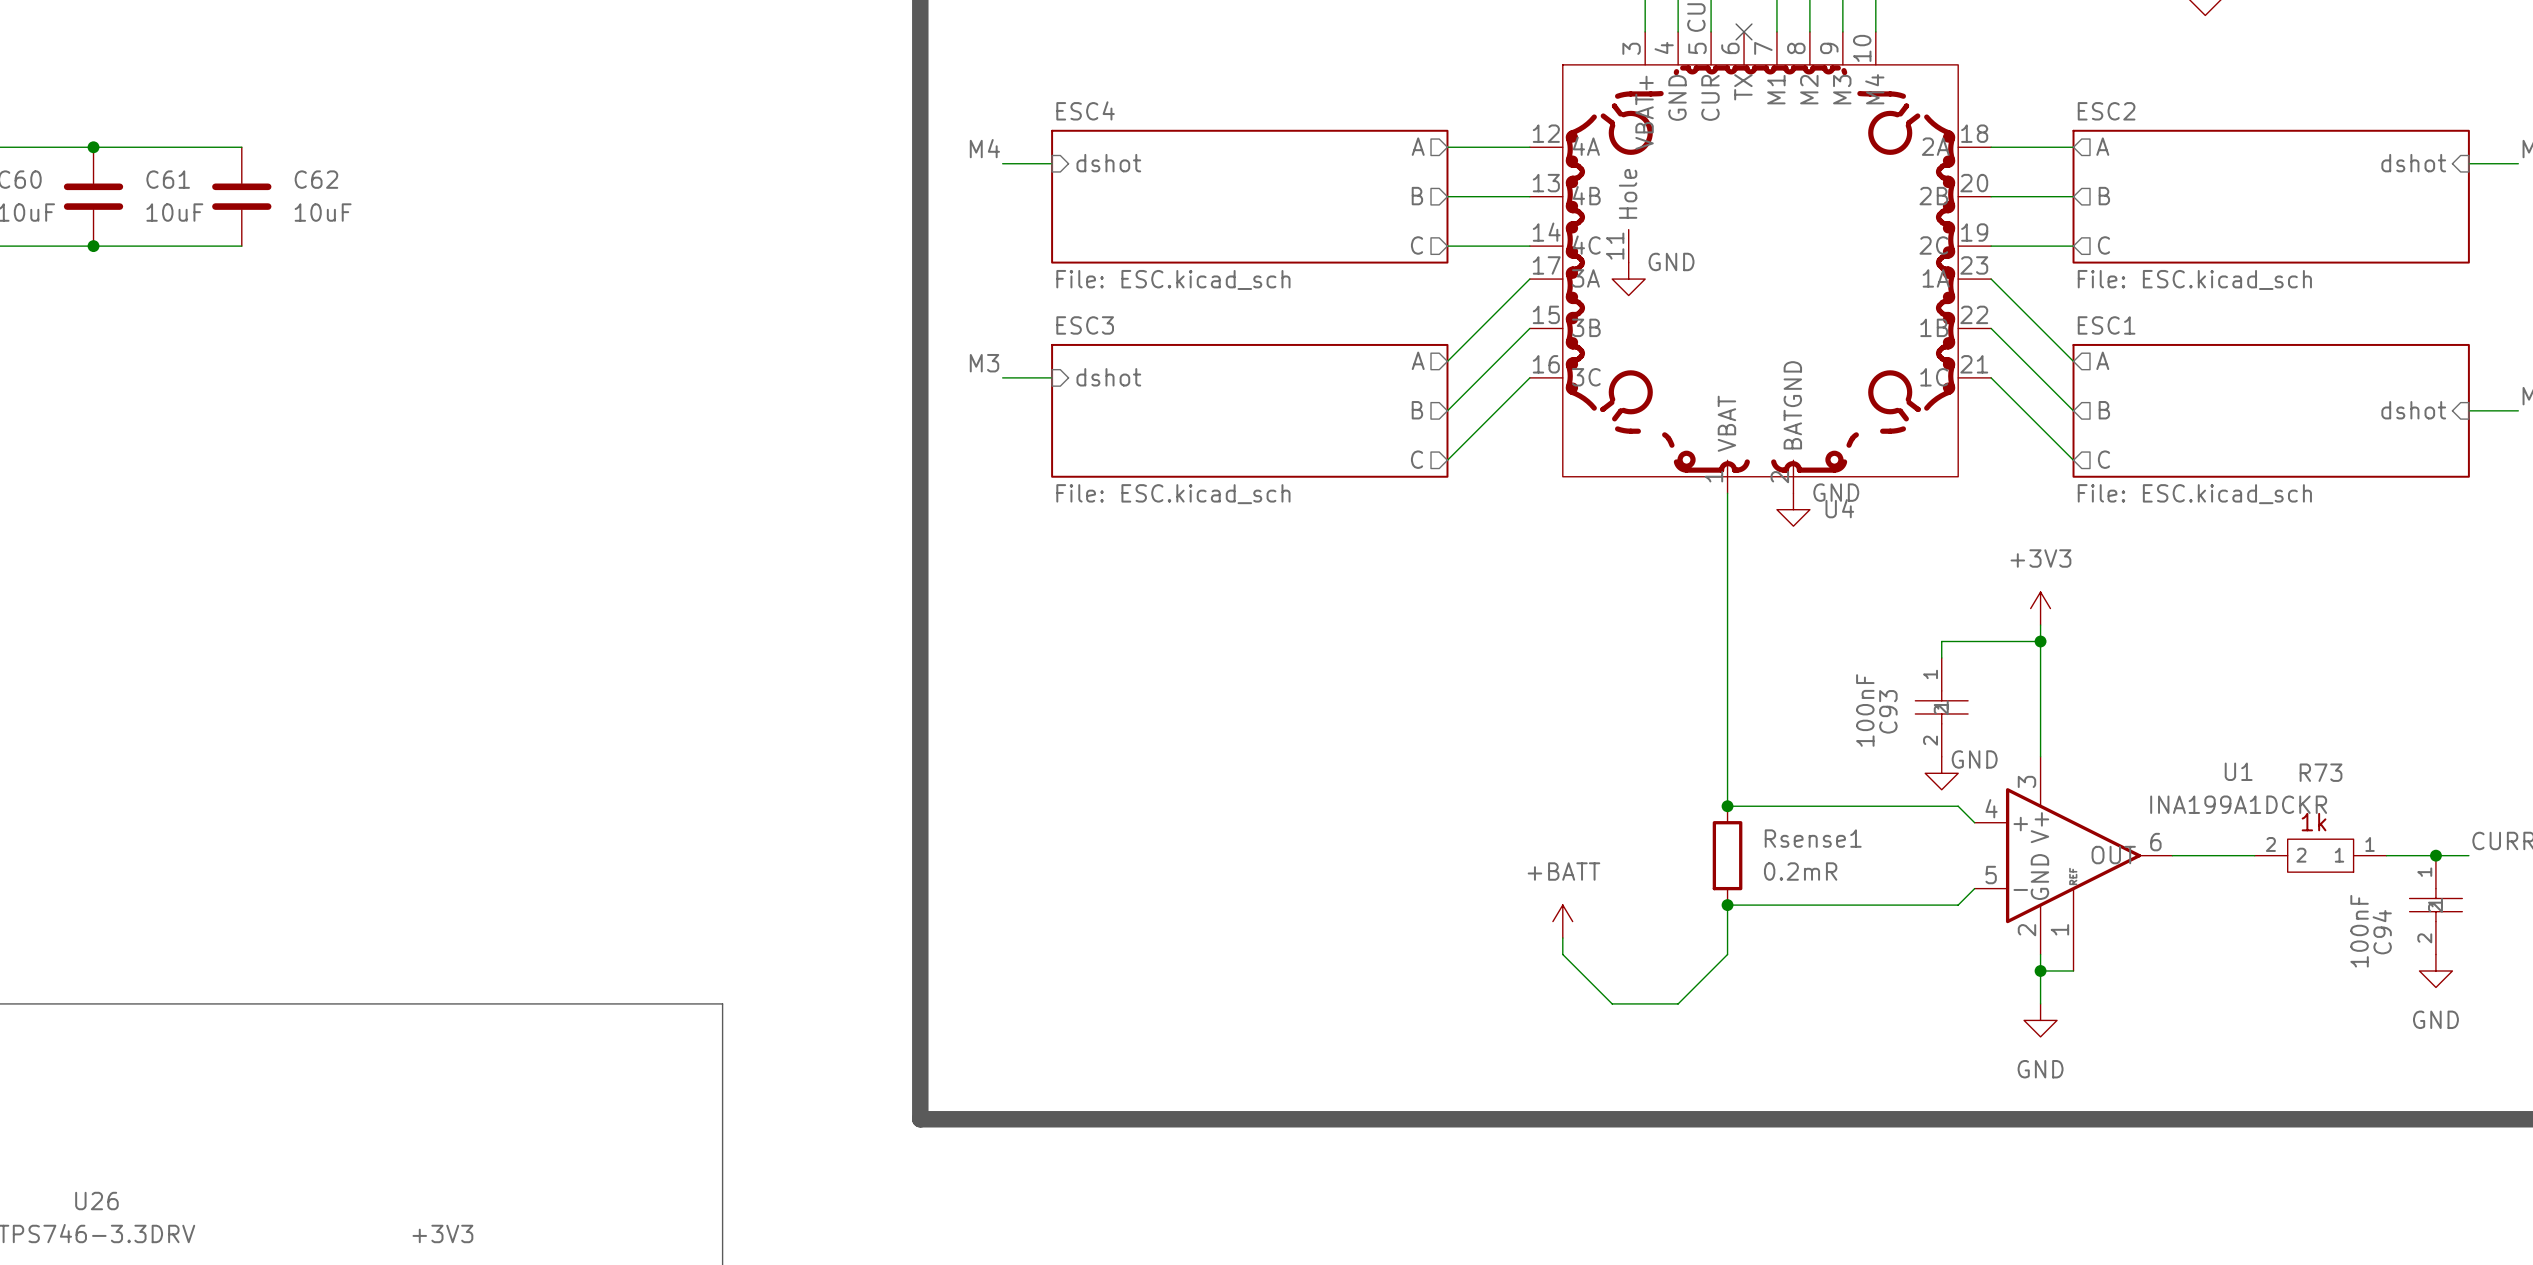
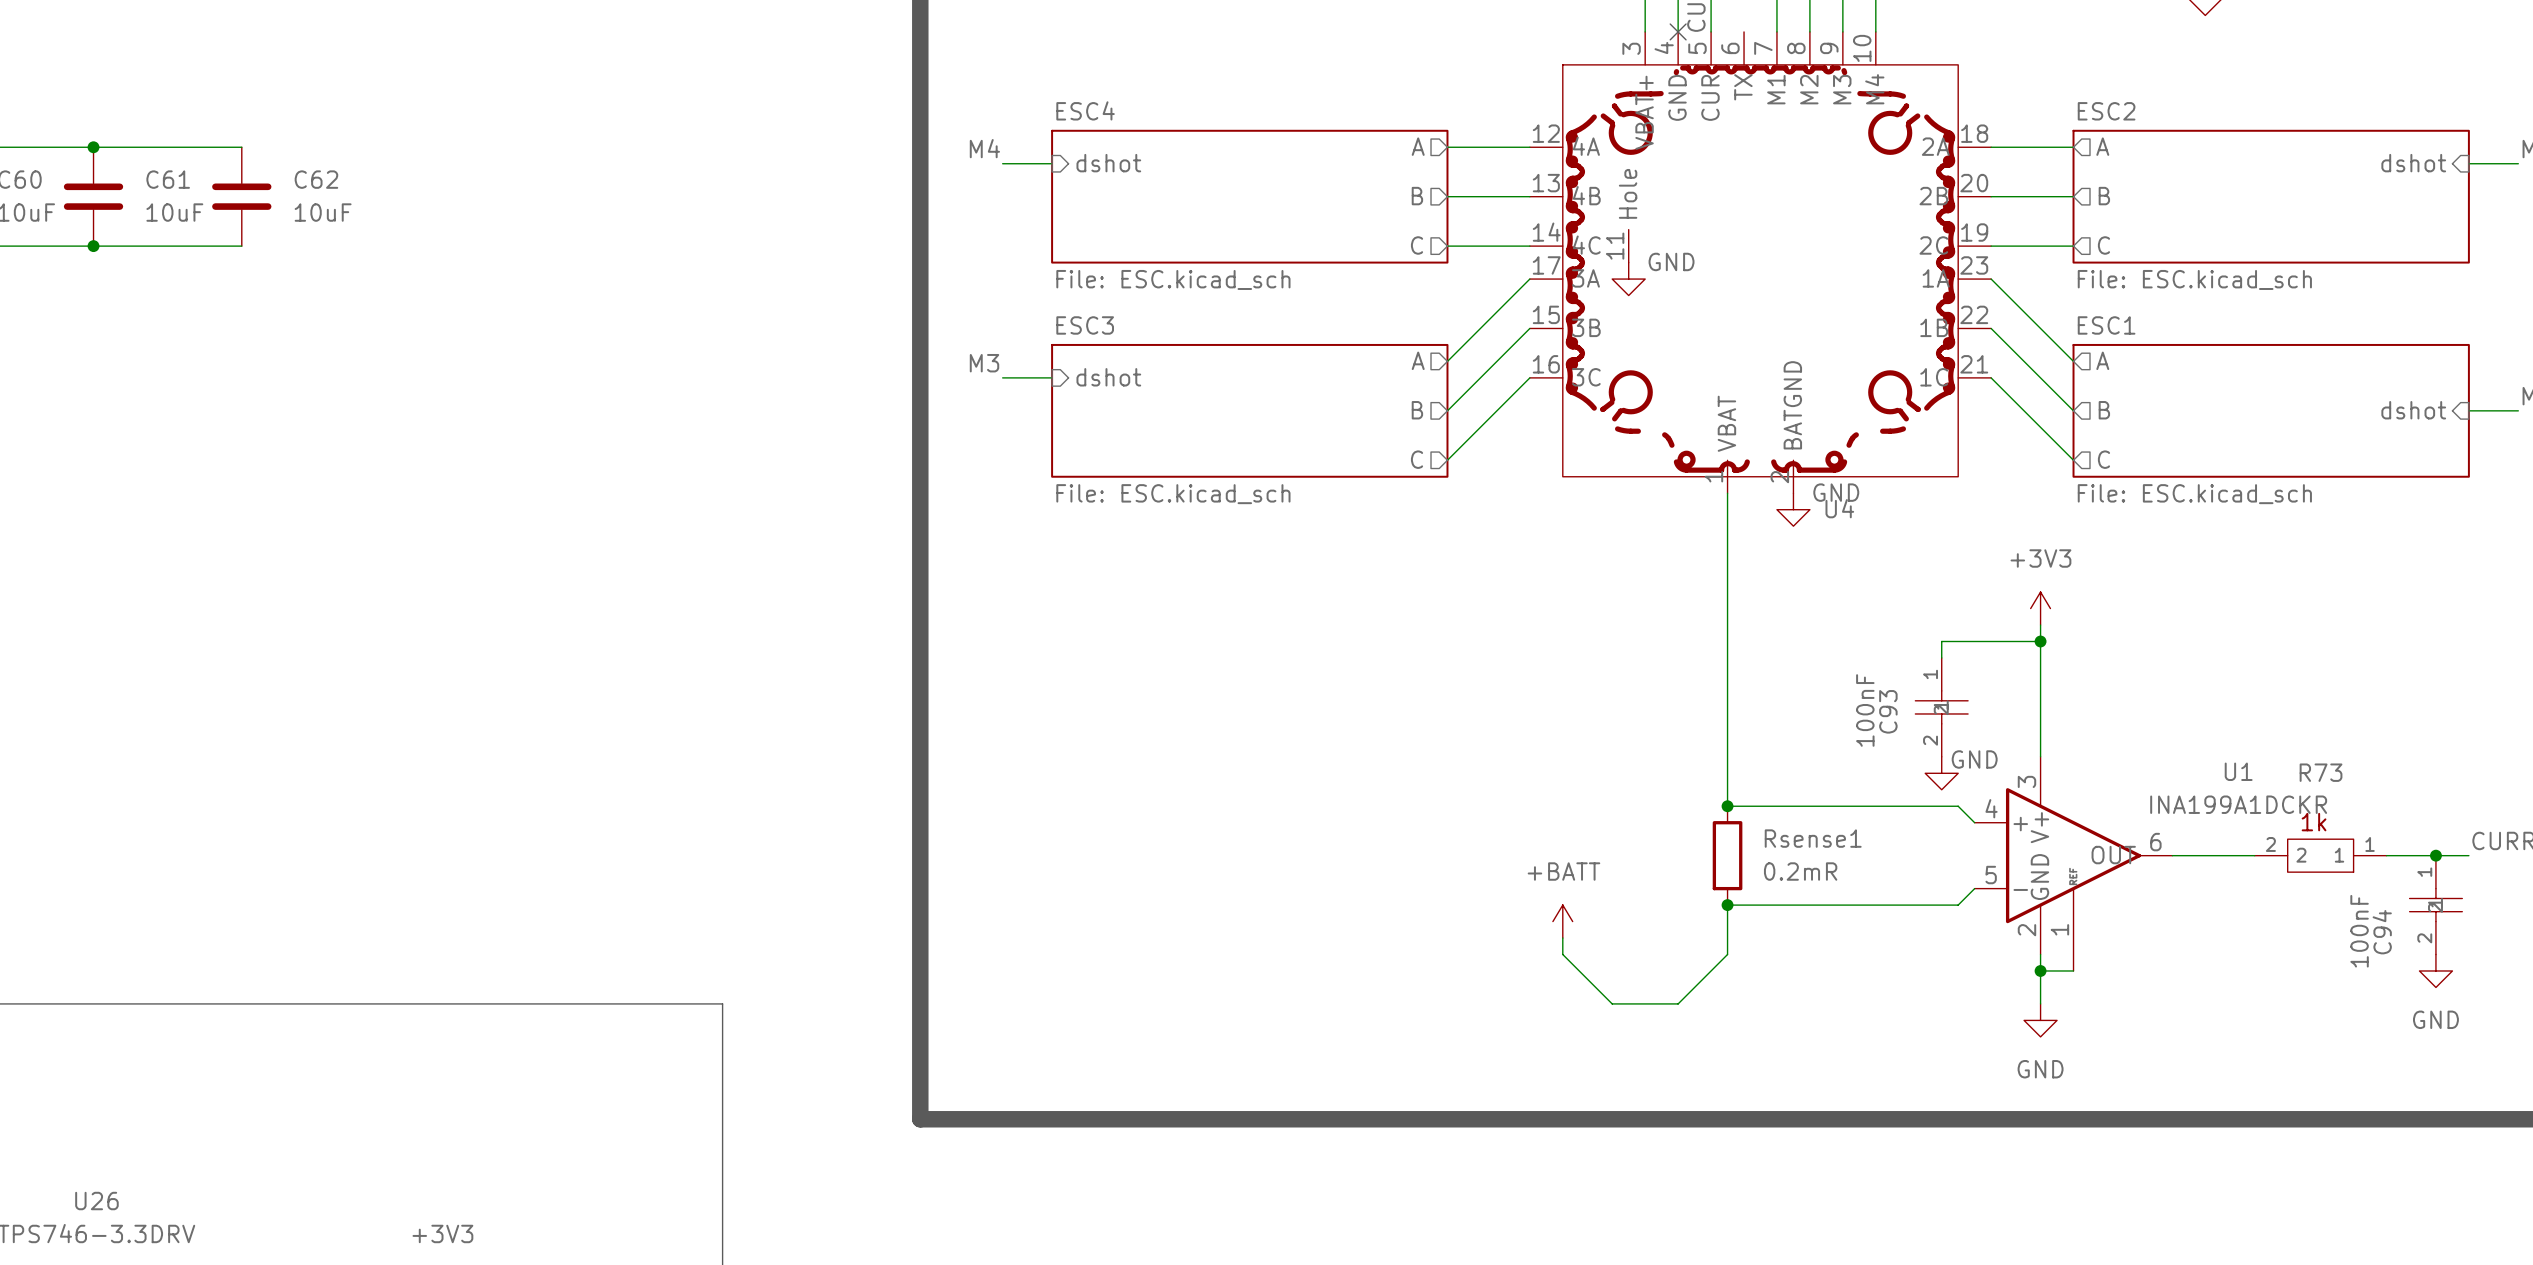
no-connect mark position: (1744, 31) -> (1678, 31)

